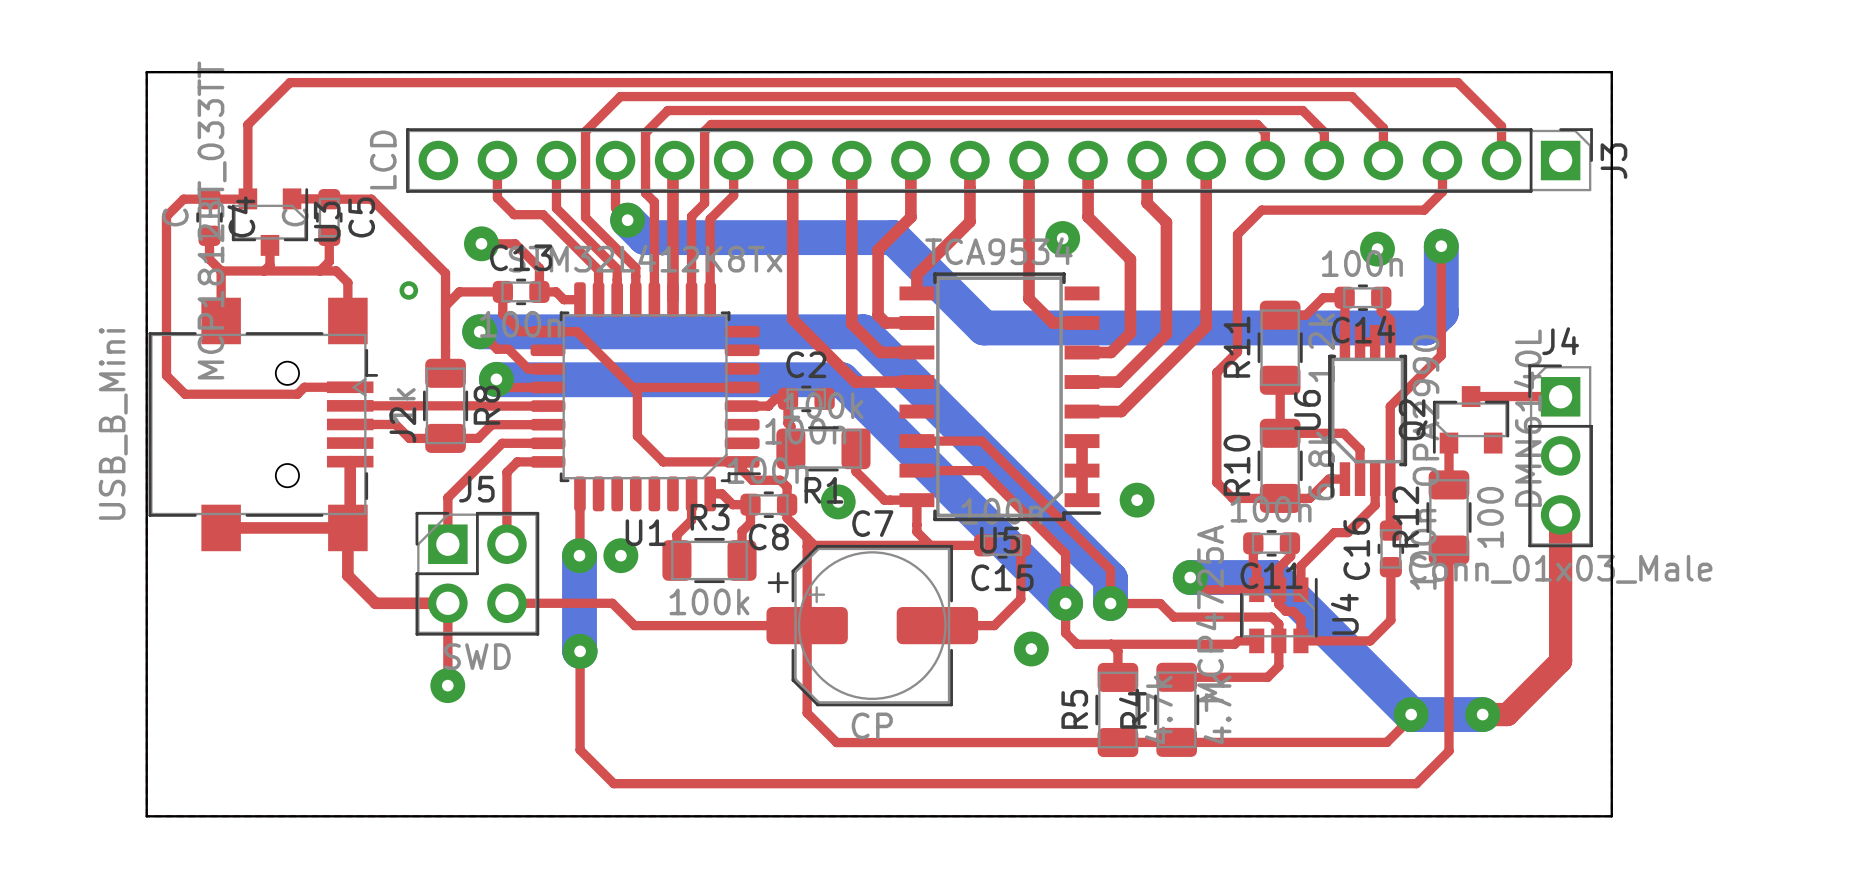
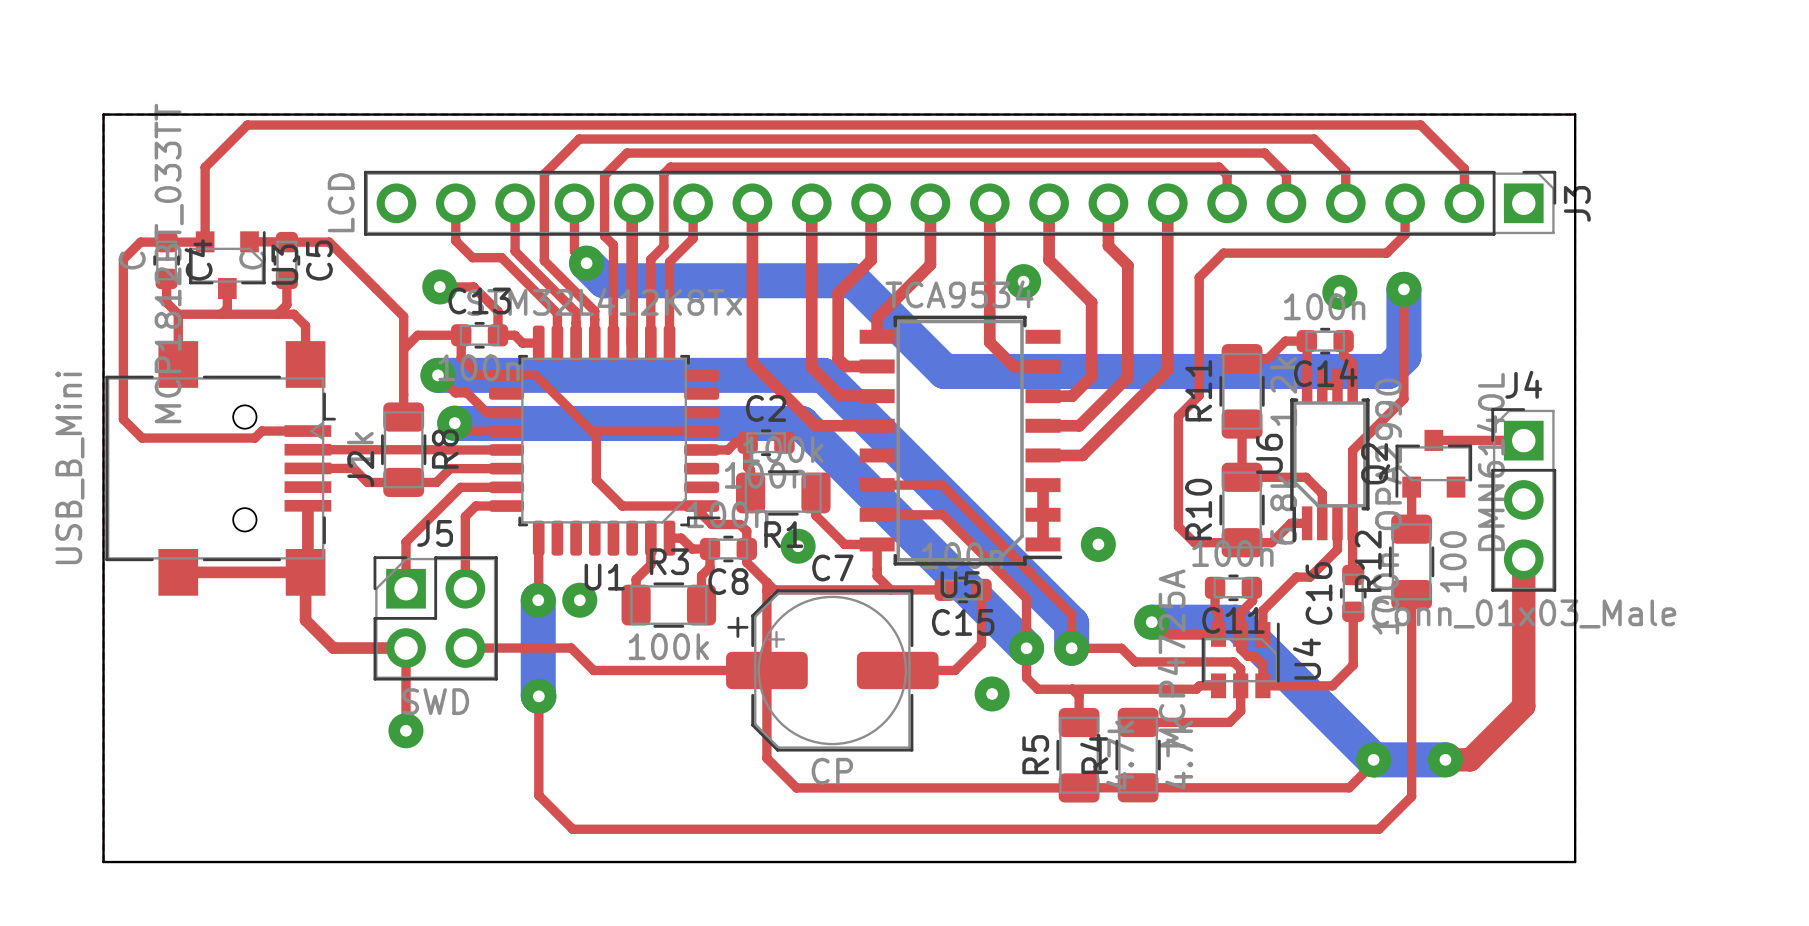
via: (408, 290) -> none

